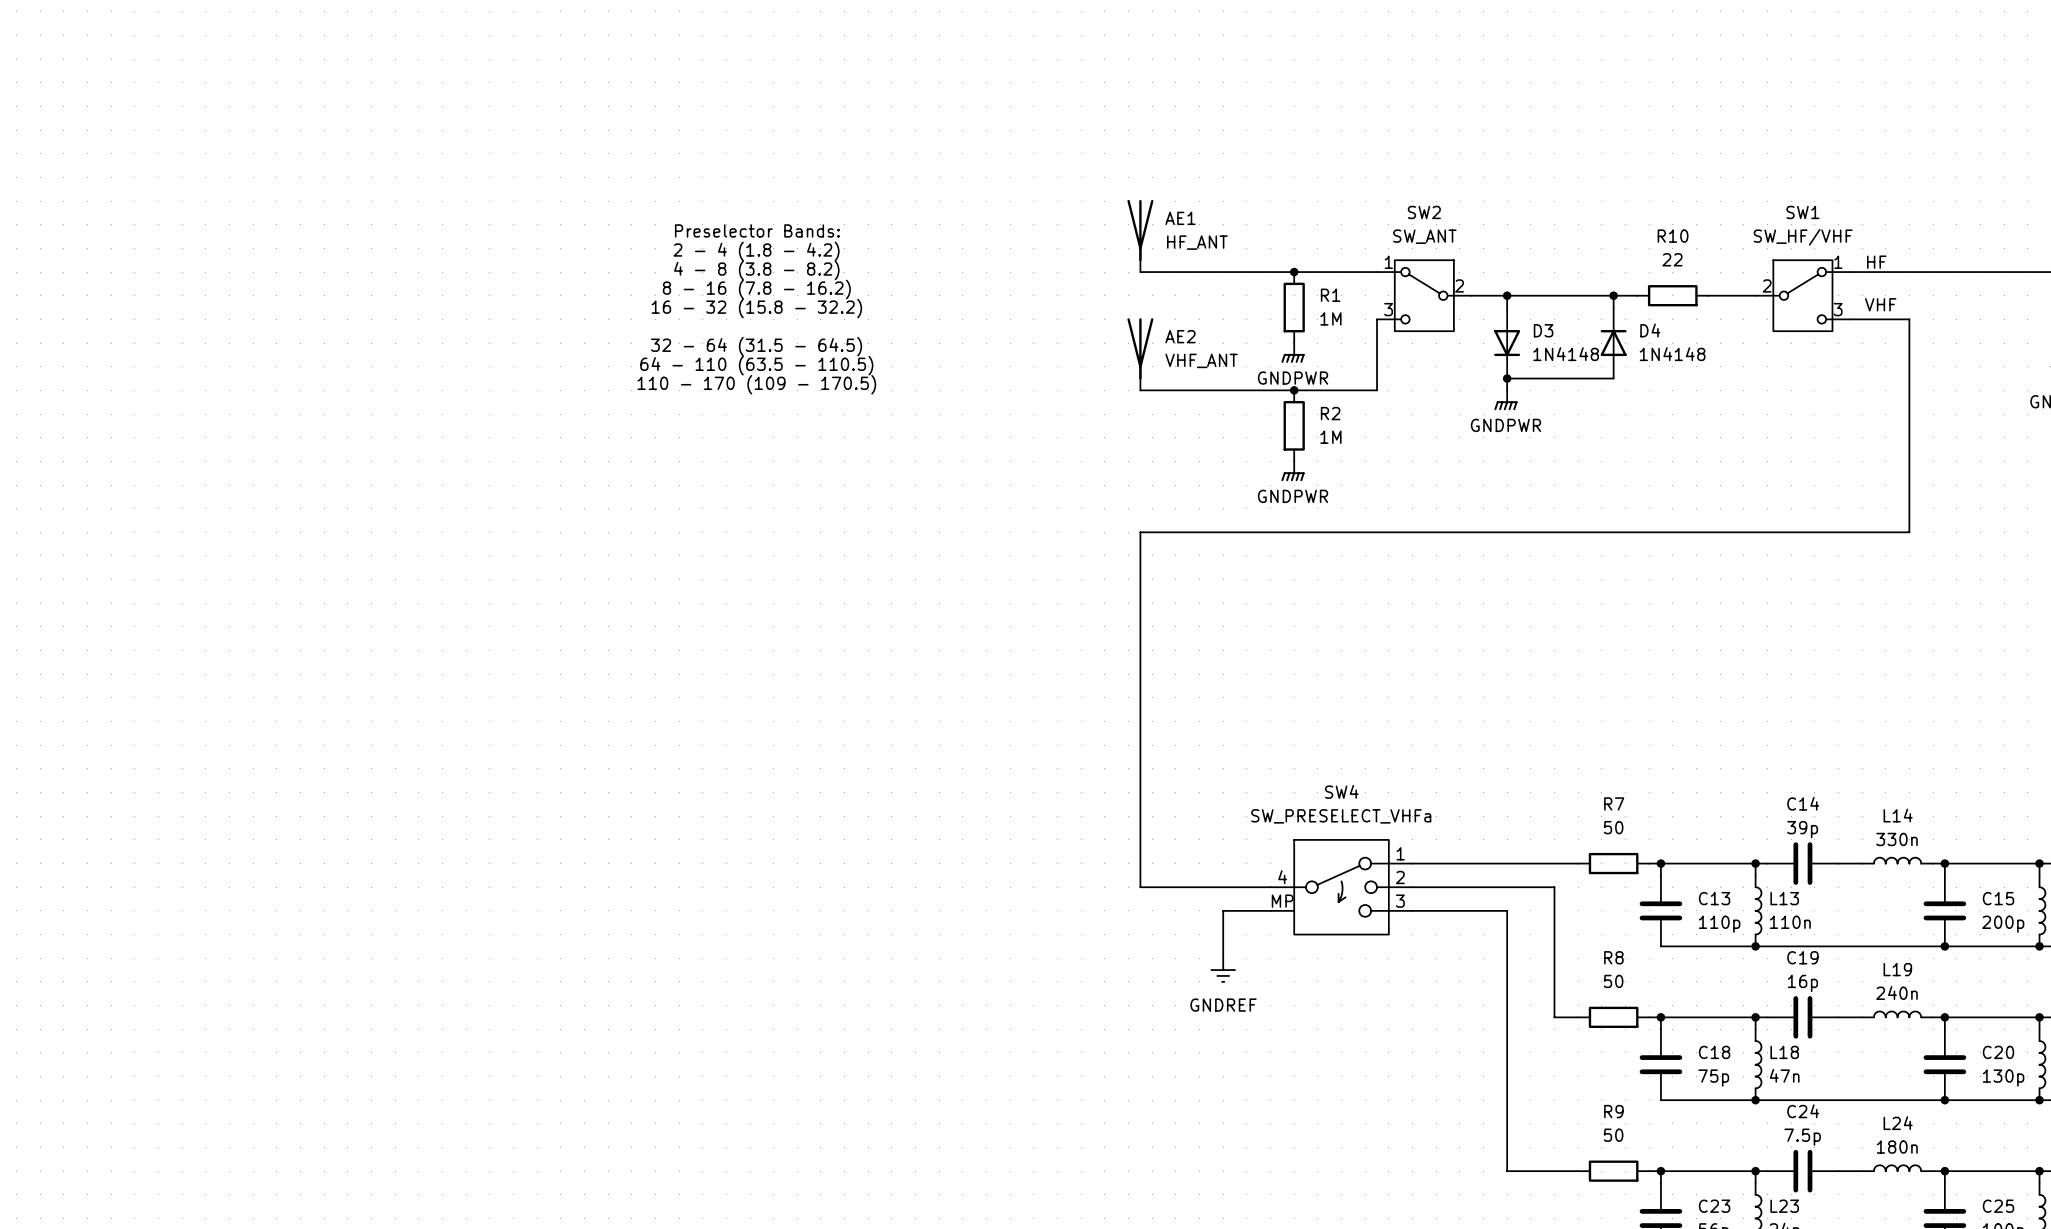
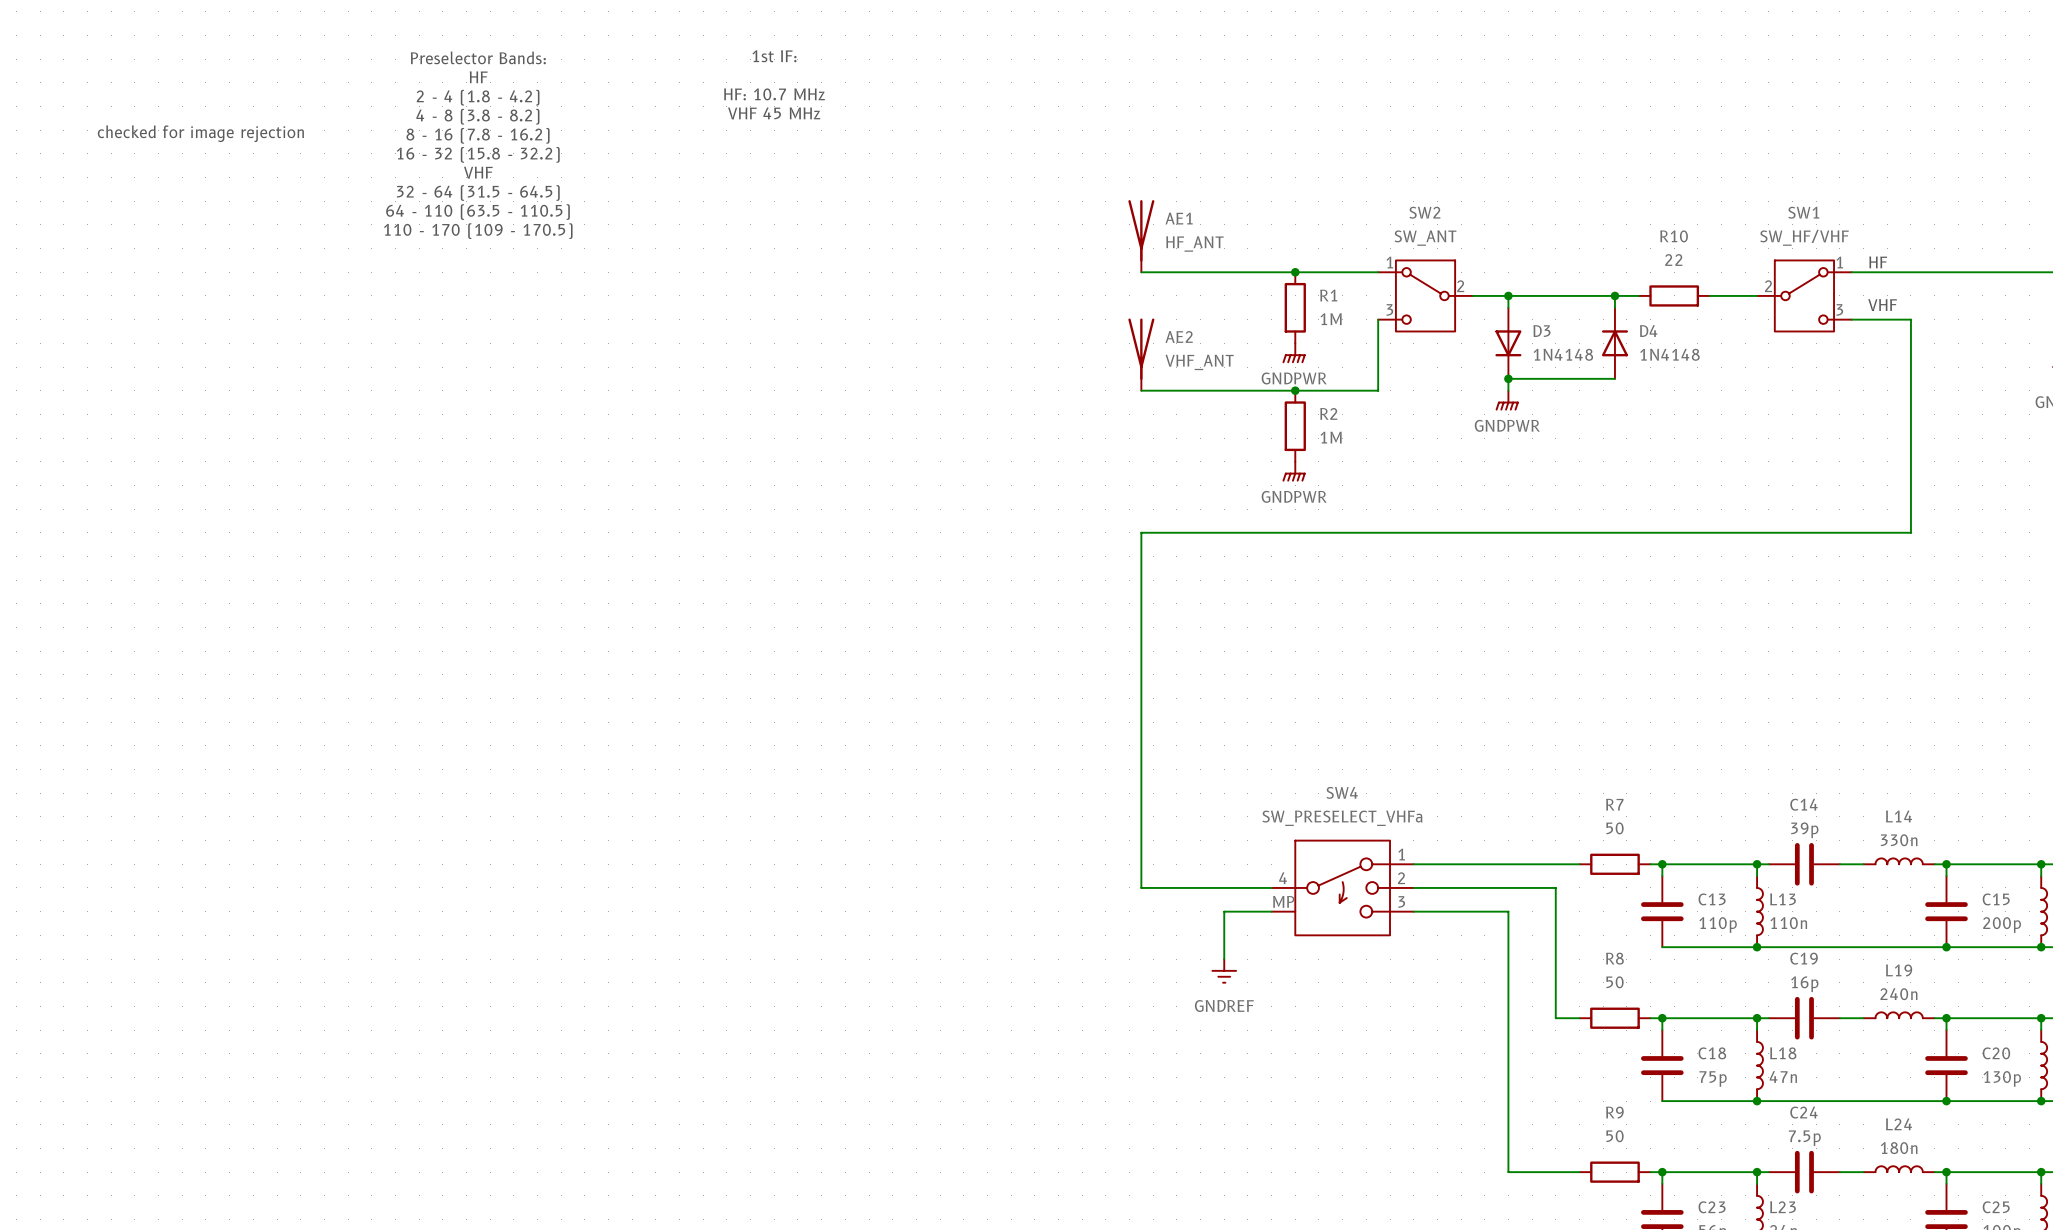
text: none -> 1st IF: (774, 56)
text: none -> Preselector Bands: (478, 57)
text: none -> HF (478, 77)
text: none -> HF: 10.7 MHz (774, 94)
text: none -> 2 - 4 (1.8 - 4.2) (478, 97)
text: none -> VHF 45 MHz (774, 113)
text: none -> 4 - 8 (3.8 - 8.2) (477, 116)
text: none -> checked for image rejection (200, 133)
text: none -> 8 - 16 (7.8 - 16.2) (478, 135)
text: none -> 16 - 32 (15.8 - 32.2) (478, 154)
text: none -> VHF (478, 172)
text: none -> 32 - 64 (31.5 - 64.5) (478, 192)
text: none -> 64 - 110 (63.5 - 110.5) (478, 212)
text: Preselector Bands: (757, 230) -> none
text: none -> 110 - 170 (109 - 170.5) (478, 231)
text: 2 - 4 (1.8 - 4.2) (756, 251) -> none
text: 4 - 8 (3.8 - 8.2) (756, 270) -> none
text: 8 - 16 (7.8 - 16.2) (756, 289) -> none
text: 16 - 32 (15.8 - 32.2) (756, 308) -> none
text: 32 - 64 (31.5 - 64.5) (756, 346) -> none
text: 64 - 110 (63.5 - 110.5) (756, 365) -> none
text: 110 - 170 (109 - 170.5) (756, 384) -> none

